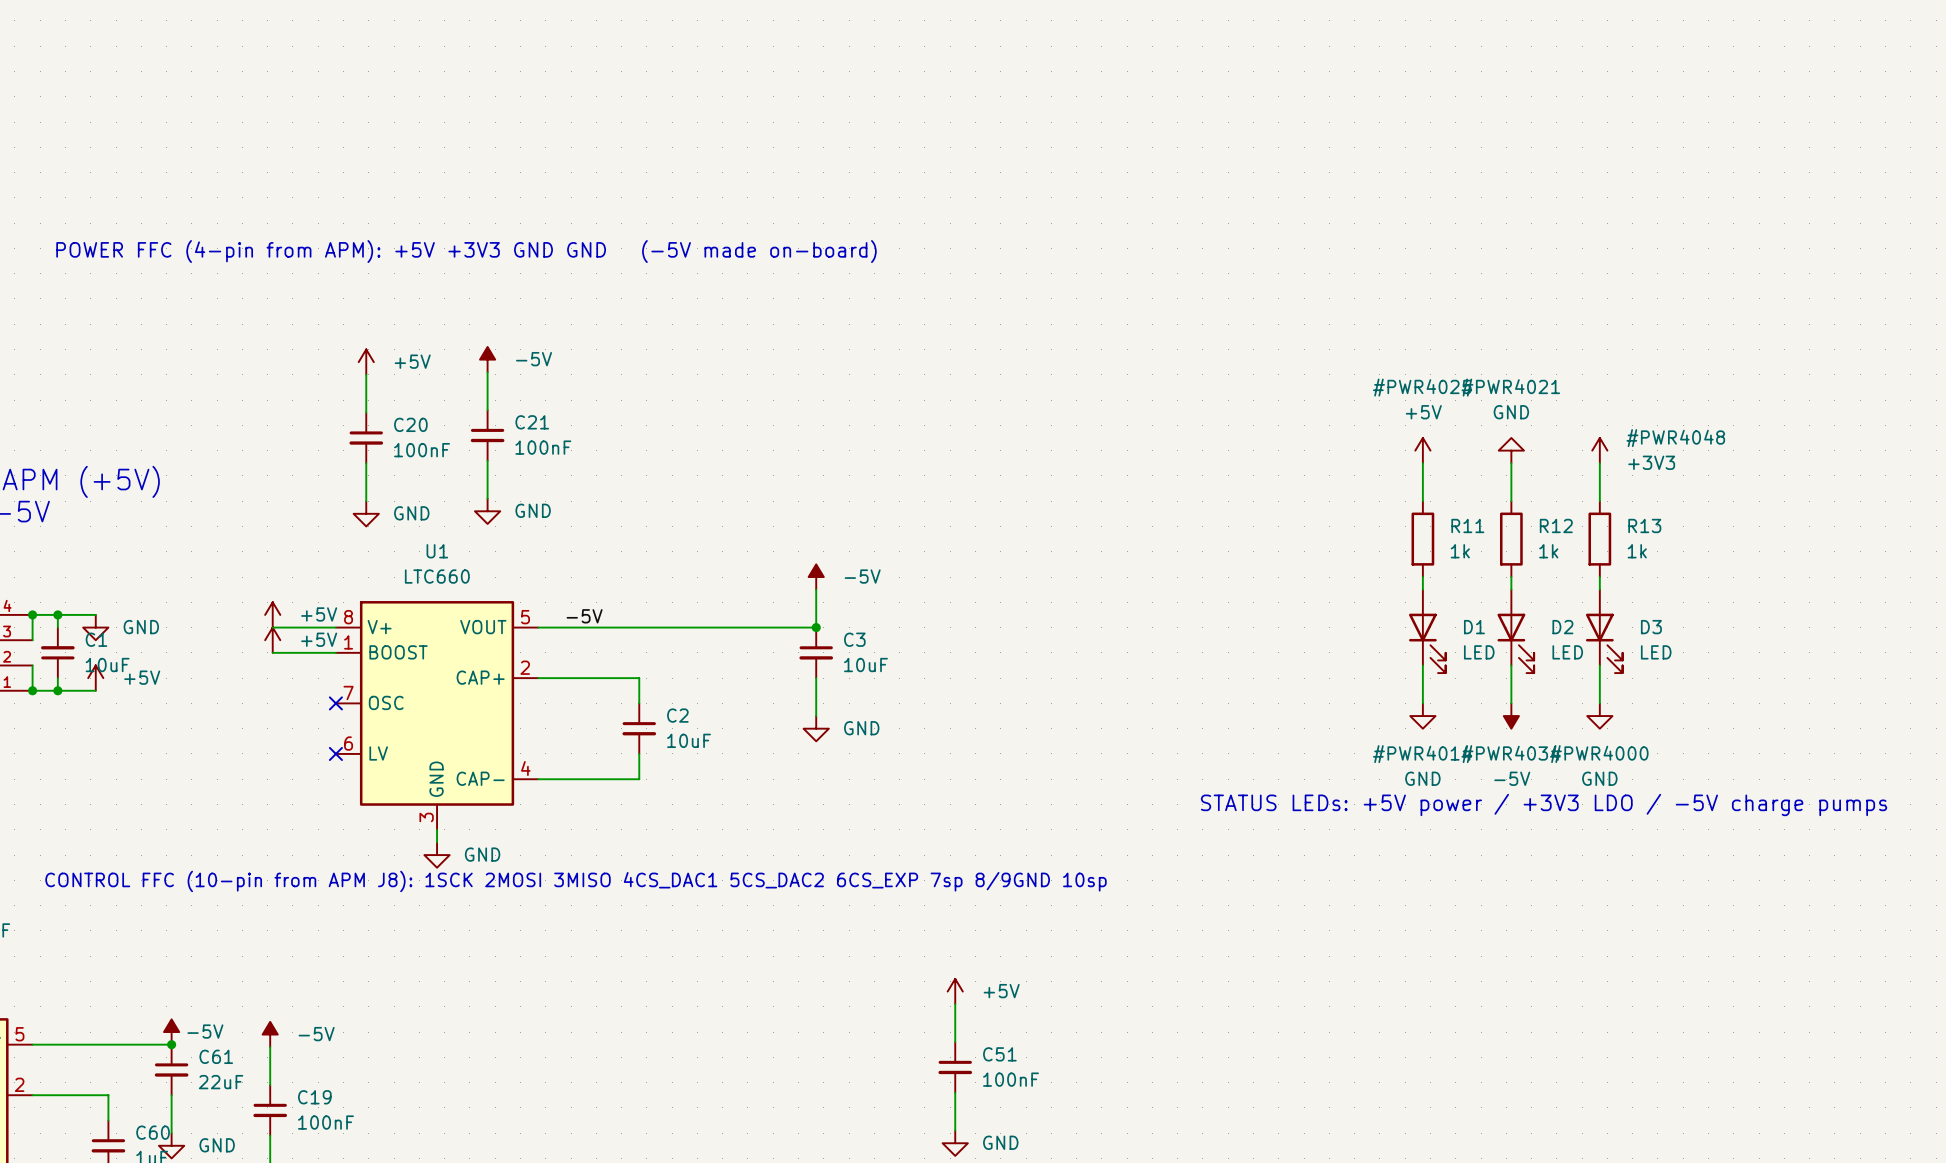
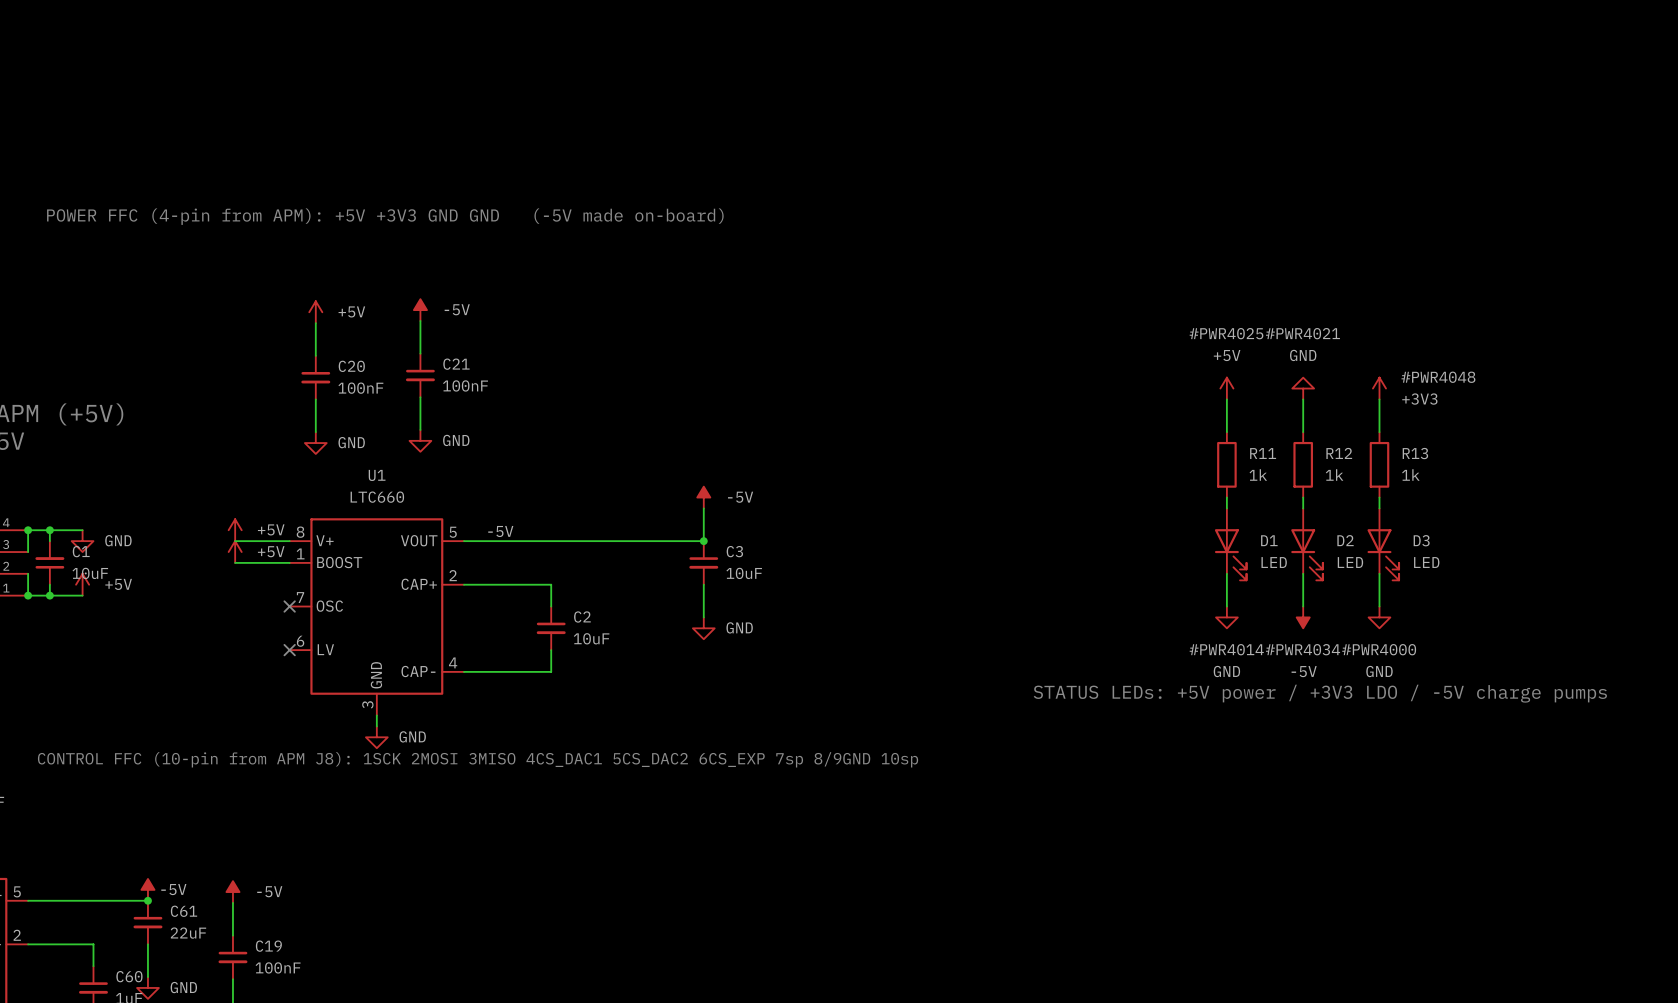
power symbol: +5V (955, 991) -> none
wire: (955, 1004) (955, 1042) -> none
C51: 100nF (955, 1067) -> none
wire: (955, 1092) (955, 1130) -> none
power symbol: GND (955, 1143) -> none

